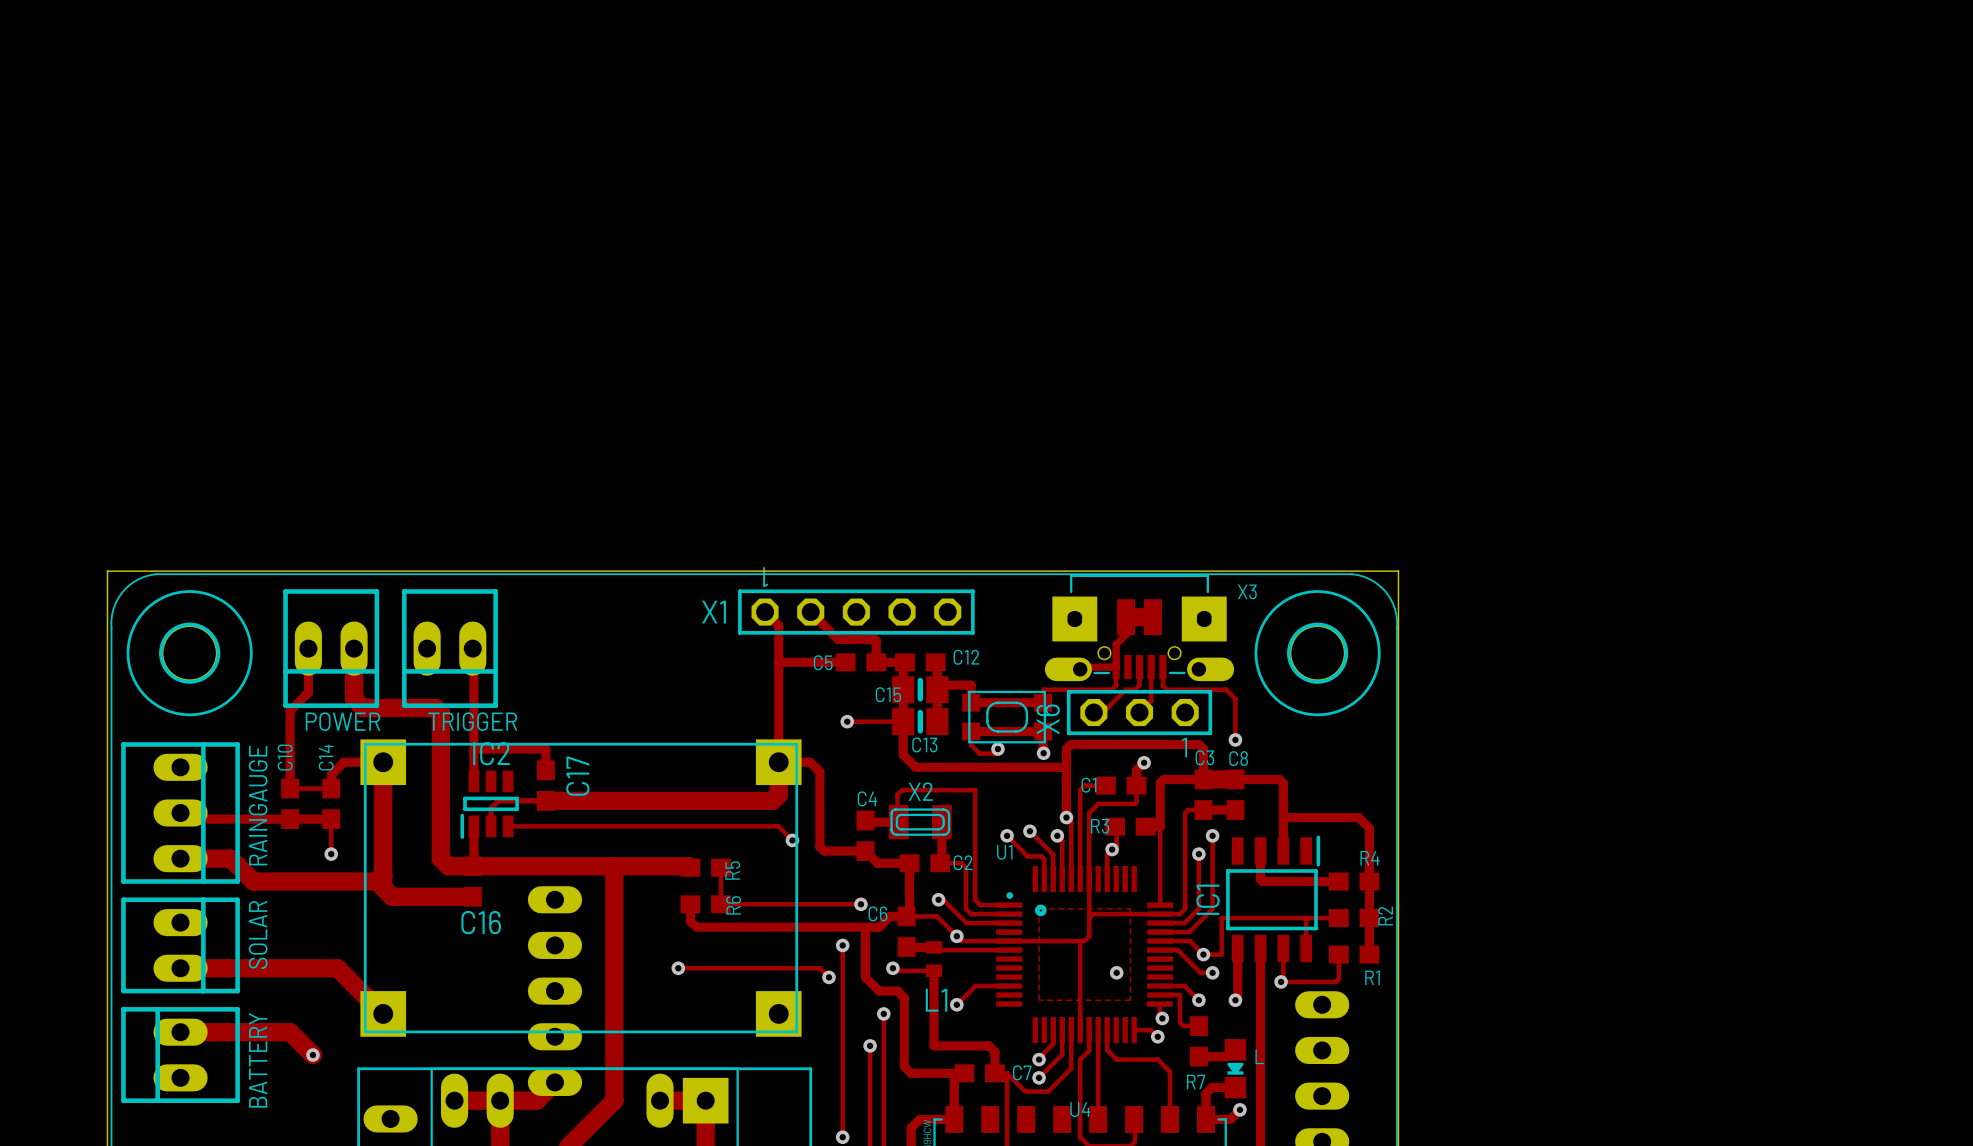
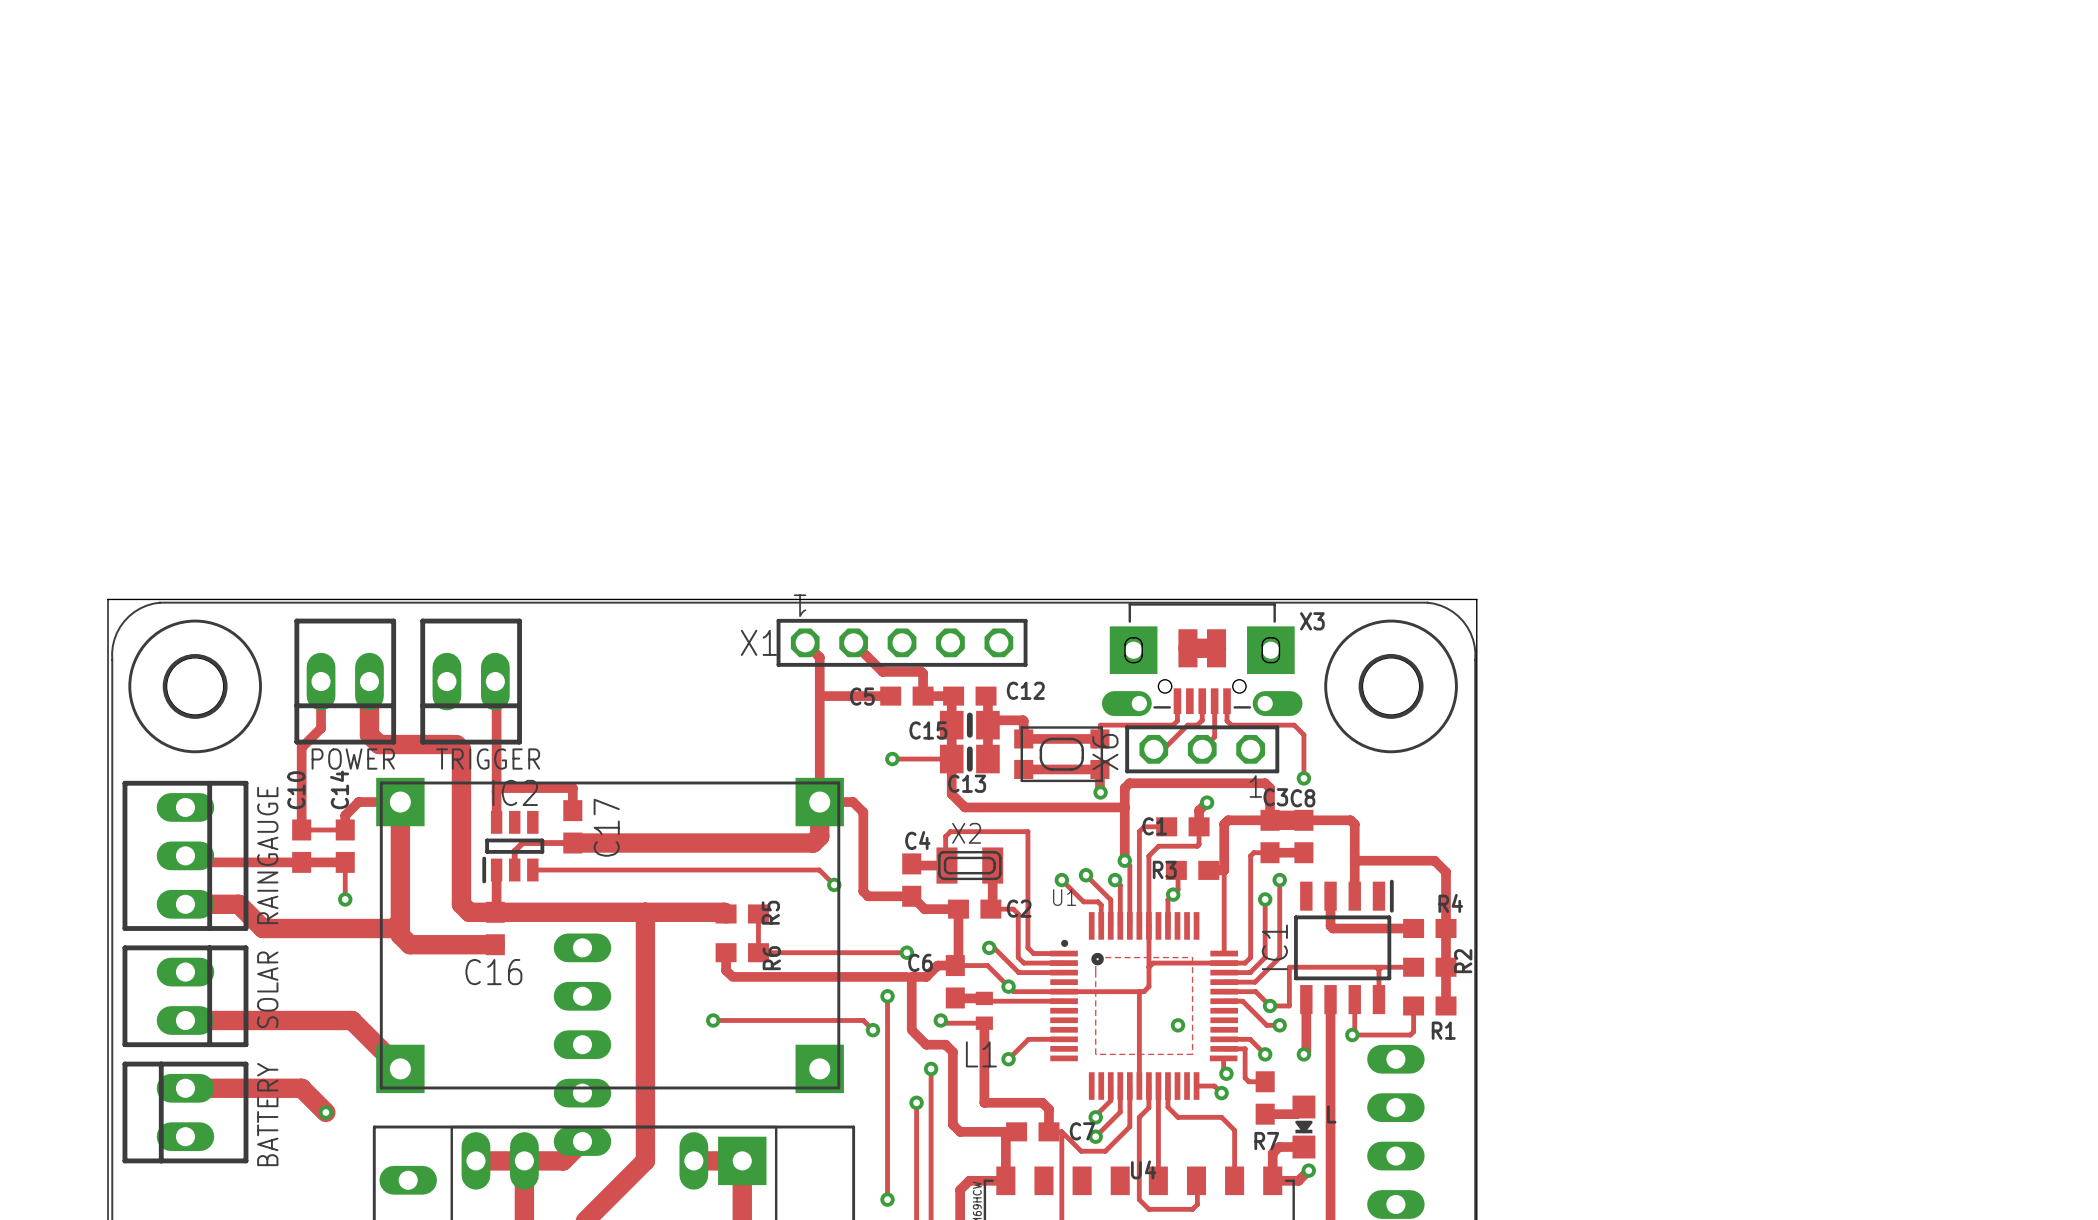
track: (1126, 617) (1126, 634) (1116, 644) (1116, 667) (1082, 667) (1080, 669) -> none
track: (971, 731) (971, 745) (979, 753) (997, 753) (997, 749) -> none
via: (997, 749) -> none

